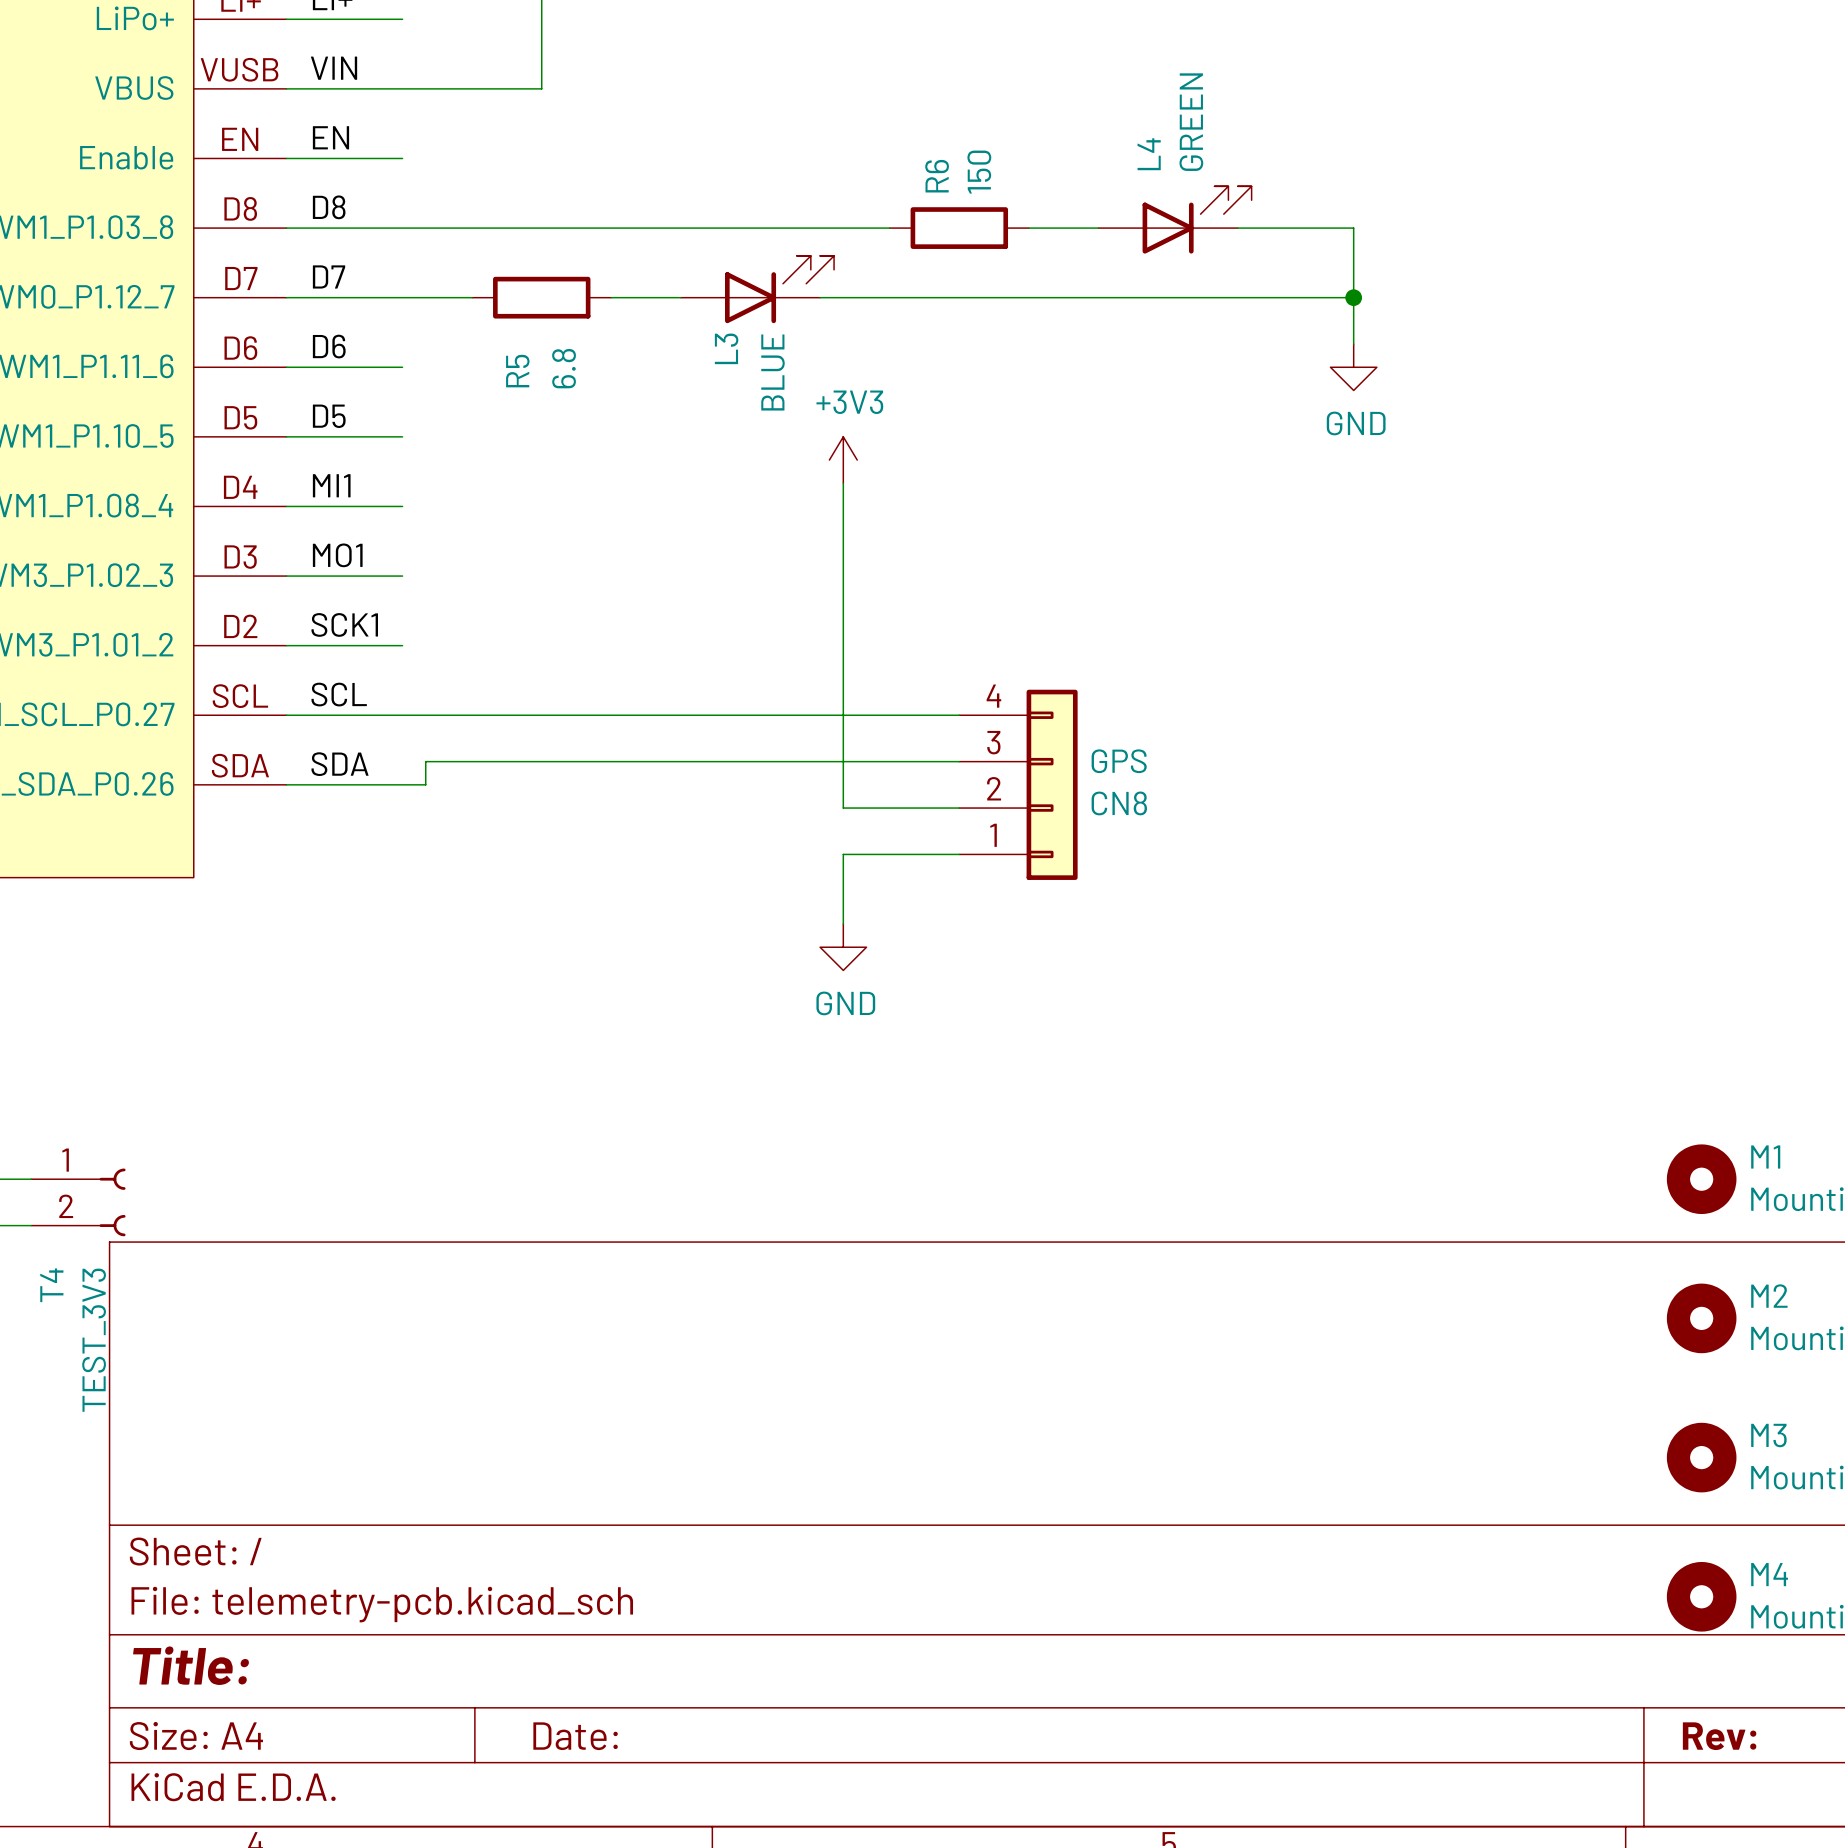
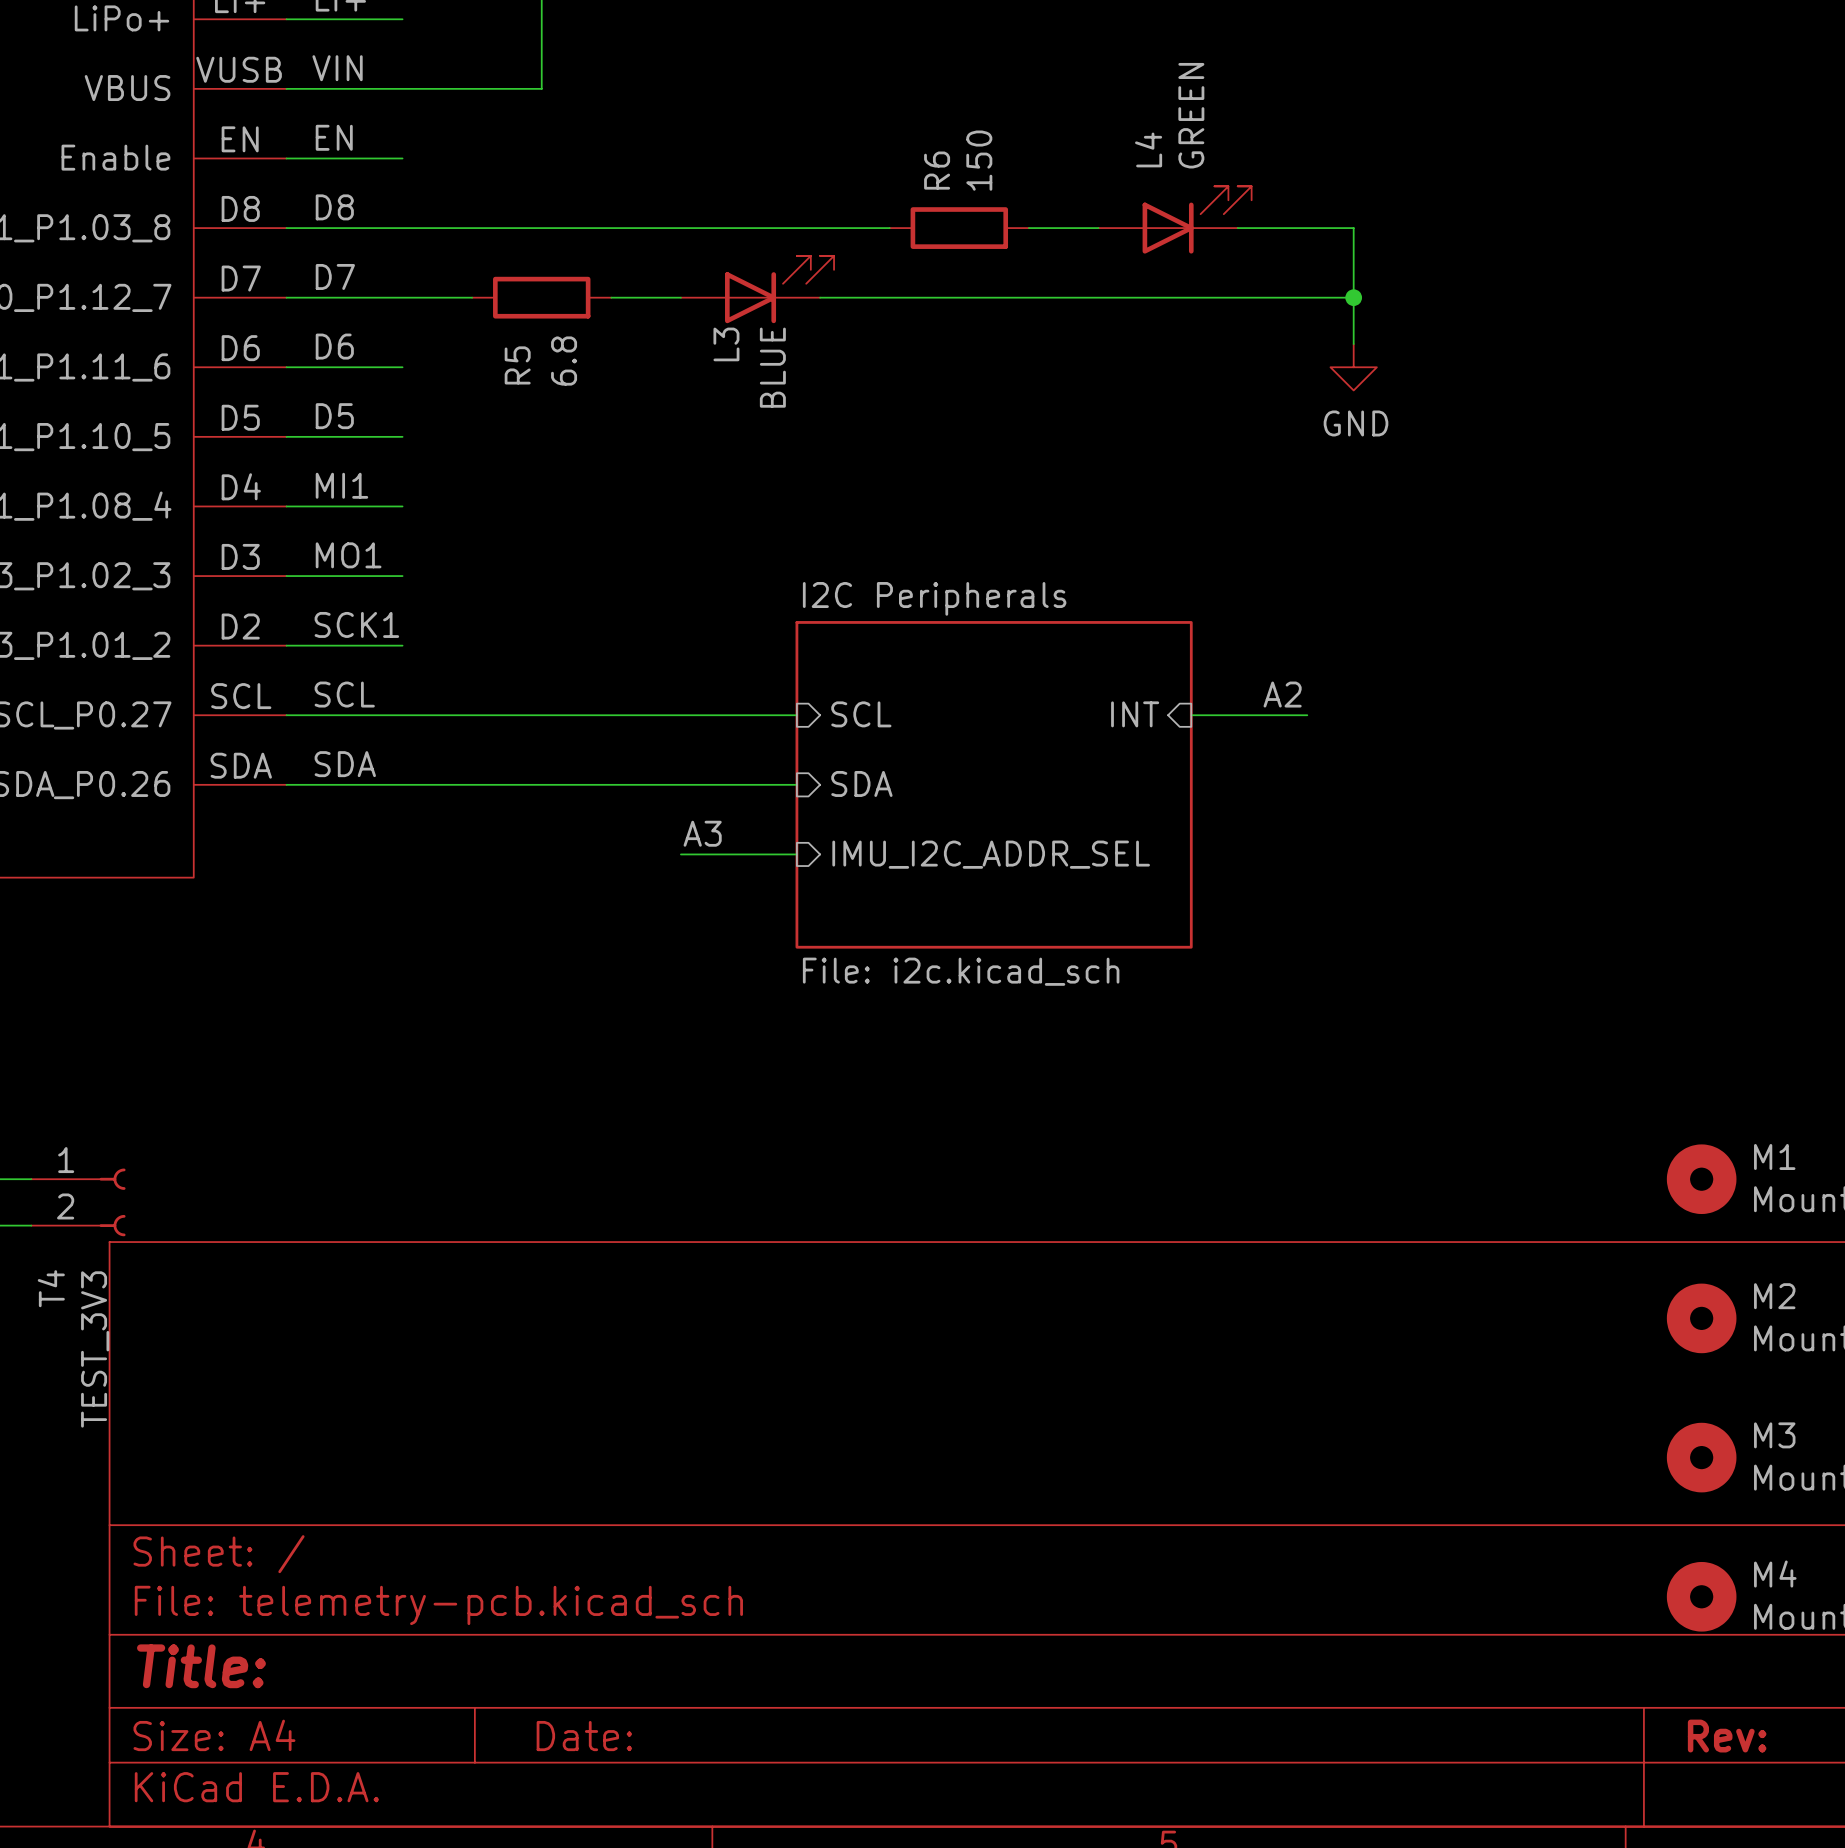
power symbol: +3V3 (843, 460) -> none
wire: (843, 483) (843, 808) (959, 808) -> none
label: none -> A2 (1282, 694)
sheet pin: none -> SCL (861, 714)
sheet pin: none -> INT (1135, 714)
wire: (796, 715) (959, 715) -> none
wire: none -> (1191, 715) (1307, 715)
wire: (959, 761) (425, 761) (425, 784) -> (796, 784) (425, 784)
sheet pin: none -> SDA (861, 783)
sheet I2C Peripherals: none -> File: i2c.kicad_sch (994, 784)
CN8: GPS (1018, 784) -> none
label: none -> A3 (702, 833)
sheet pin: none -> IMU_I2C_ADDR_SEL (991, 854)
wire: none -> (680, 854) (796, 854)
wire: (959, 854) (843, 854) (843, 924) -> none
power symbol: GND (843, 947) -> none

